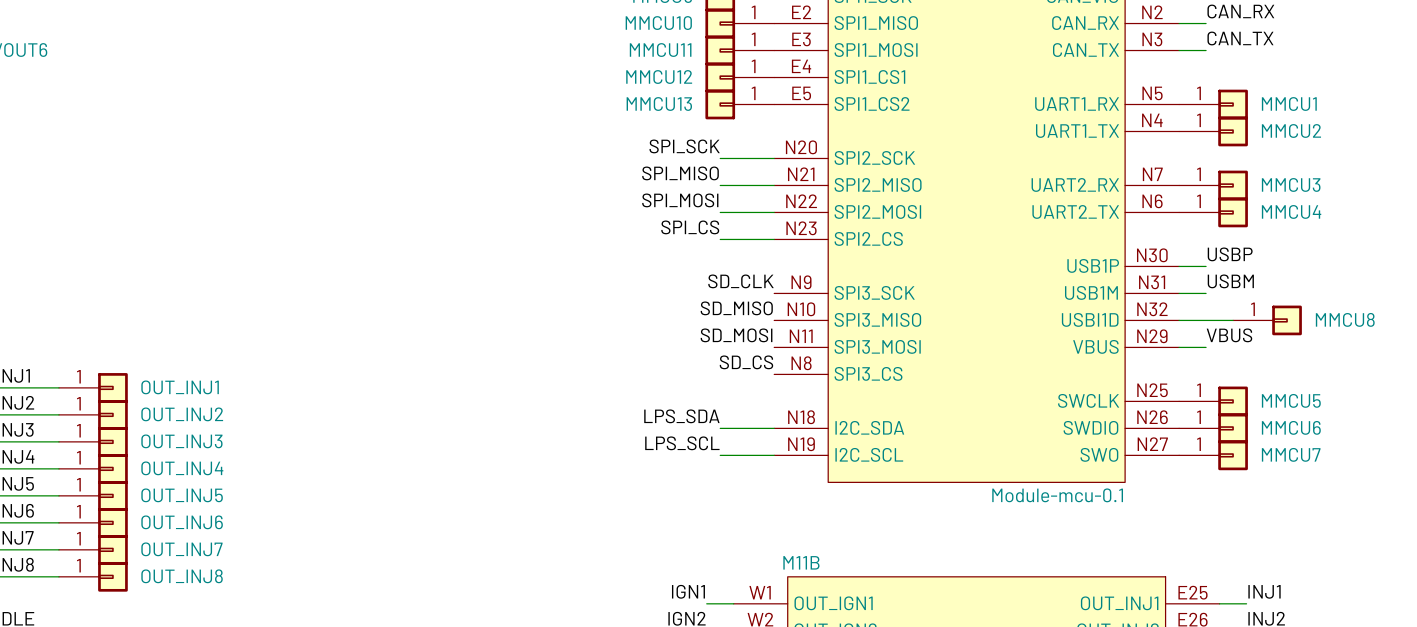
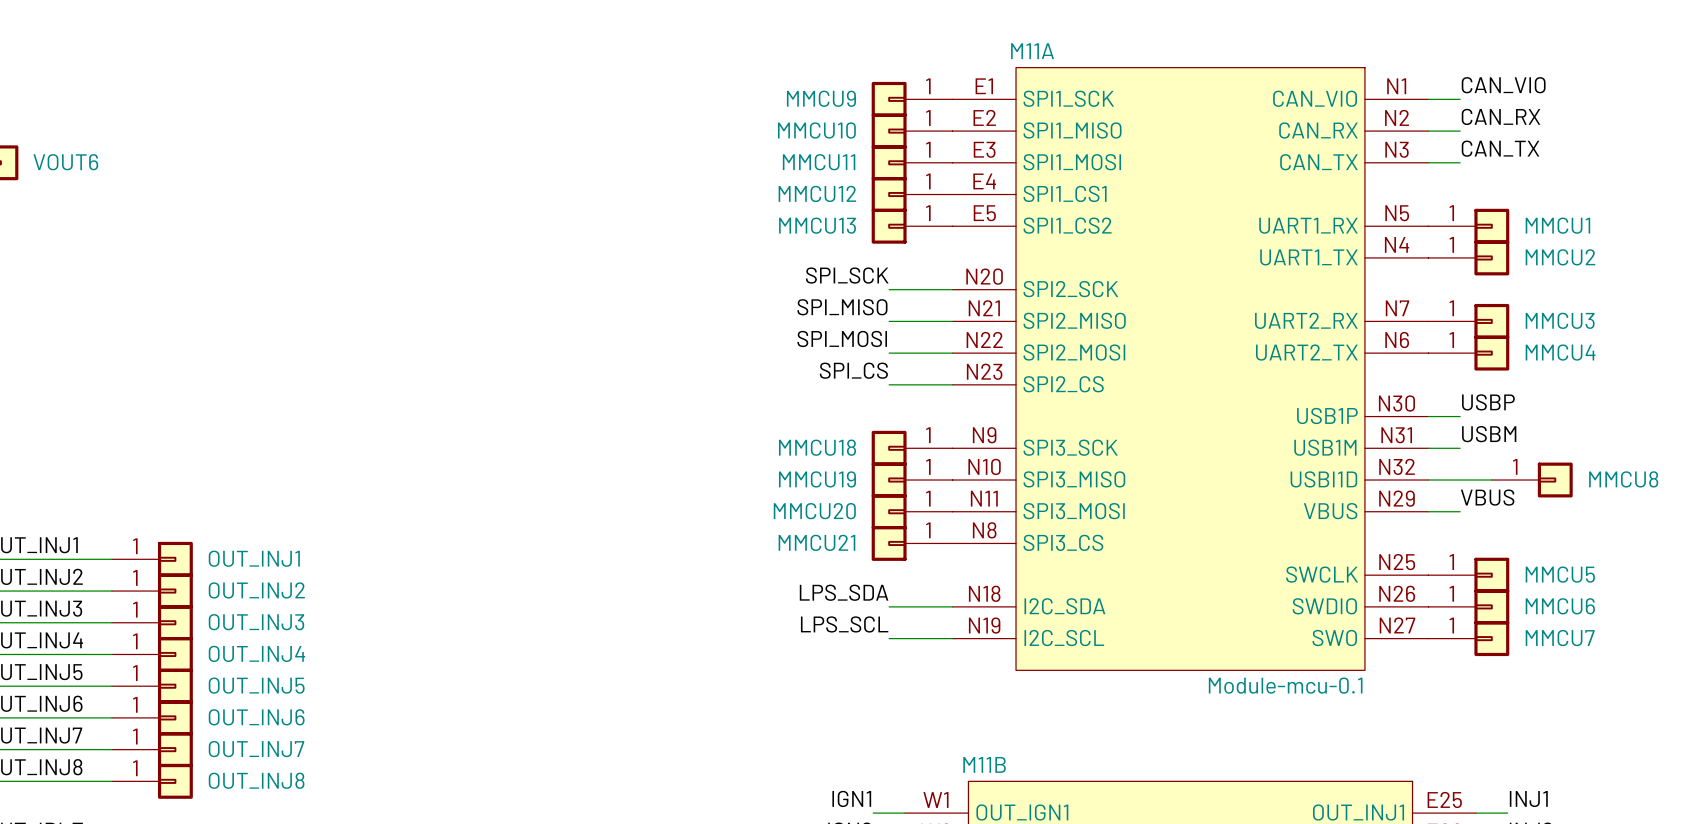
label: SD_CLK (740, 281) -> none
MMCU18: none -> (912, 448)
label: SD_MISO (736, 308) -> none
MMCU19: none -> (912, 480)
label: SD_MOSI (736, 335) -> none
MMCU20: none -> (912, 511)
label: SD_CS (746, 362) -> none
MMCU21: none -> (912, 543)

